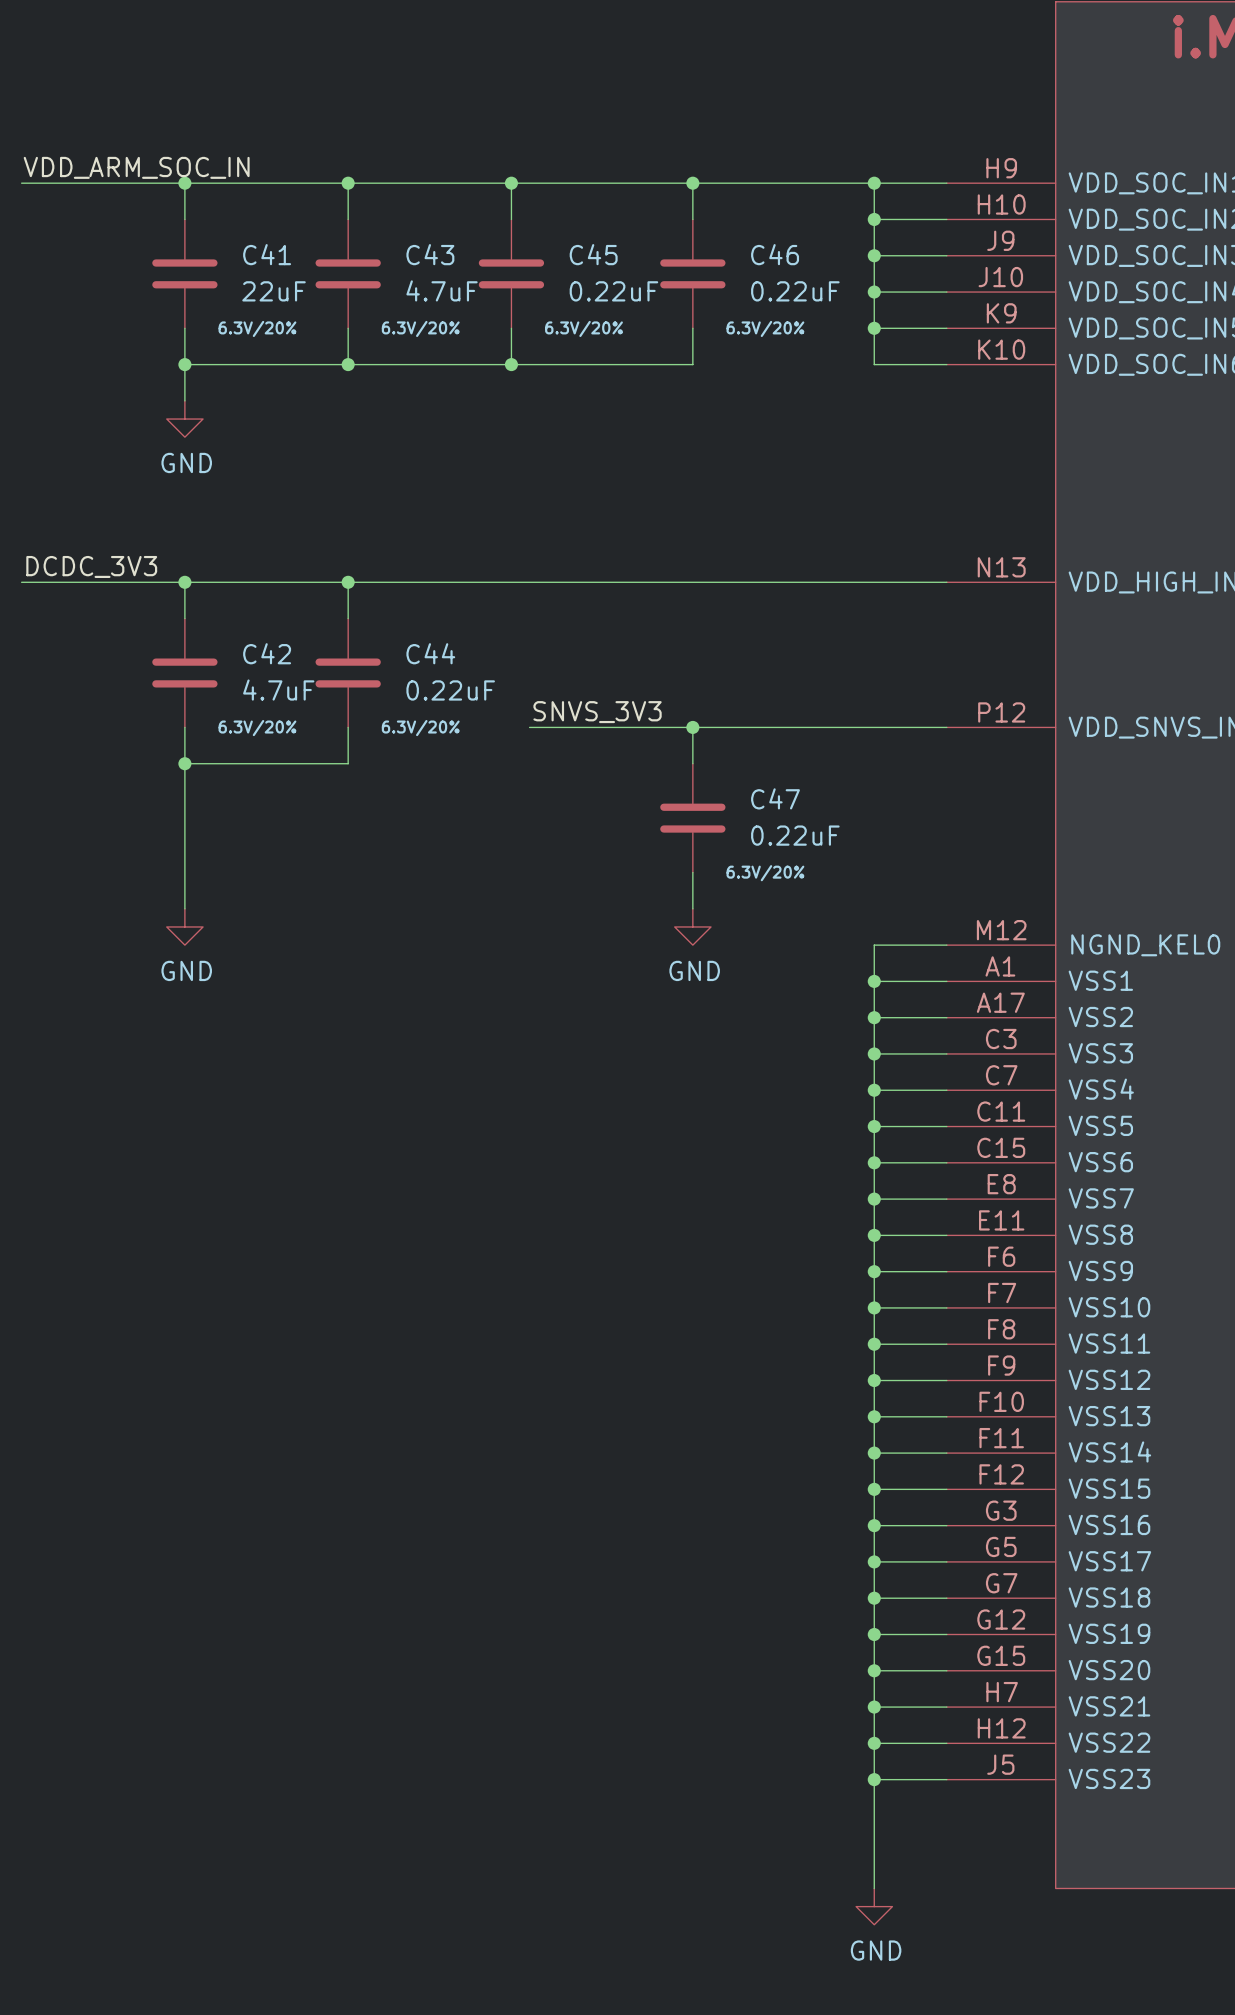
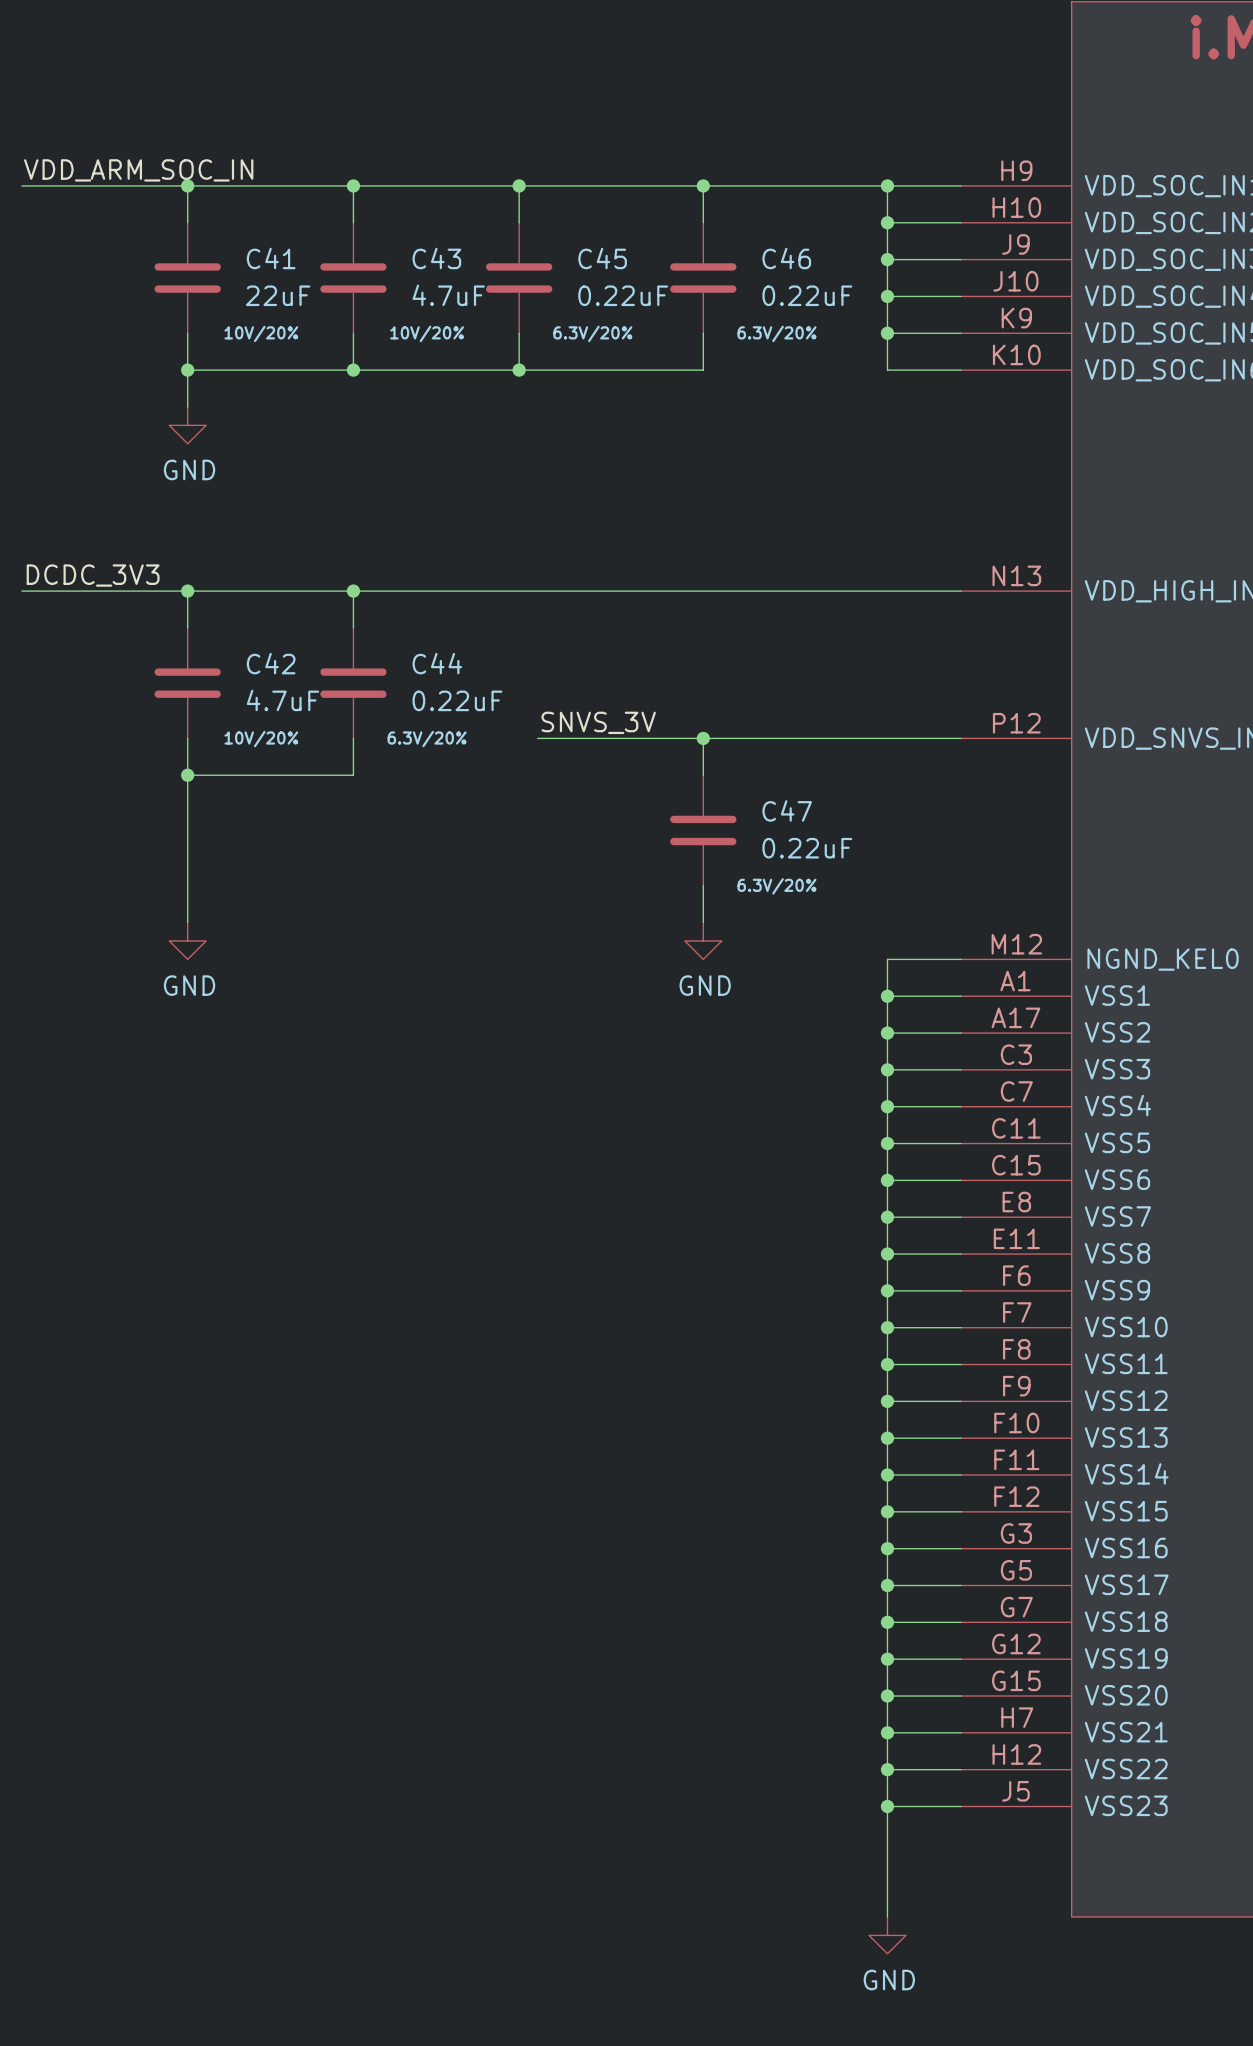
C41 text: 6.3V/20% (257, 328) -> 10V/20% (261, 333)
C43 text: 6.3V/20% (420, 328) -> 10V/20% (427, 333)
label: SNVS_3V3 (597, 712) -> SNVS_3V (598, 722)
C42 text: 6.3V/20% (257, 728) -> 10V/20% (261, 739)

